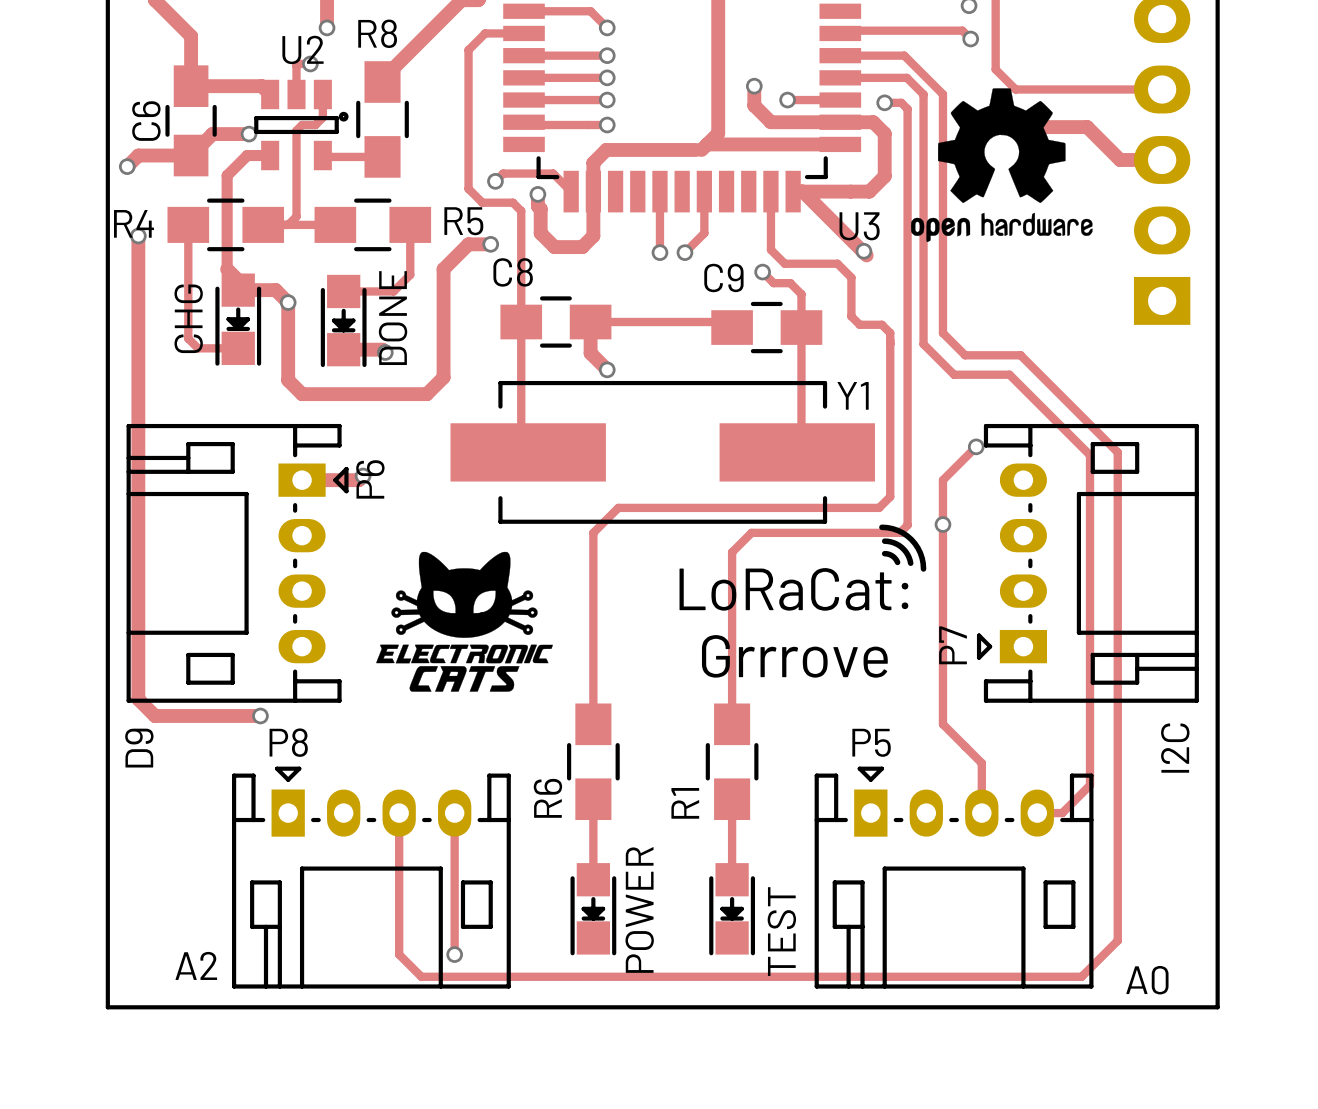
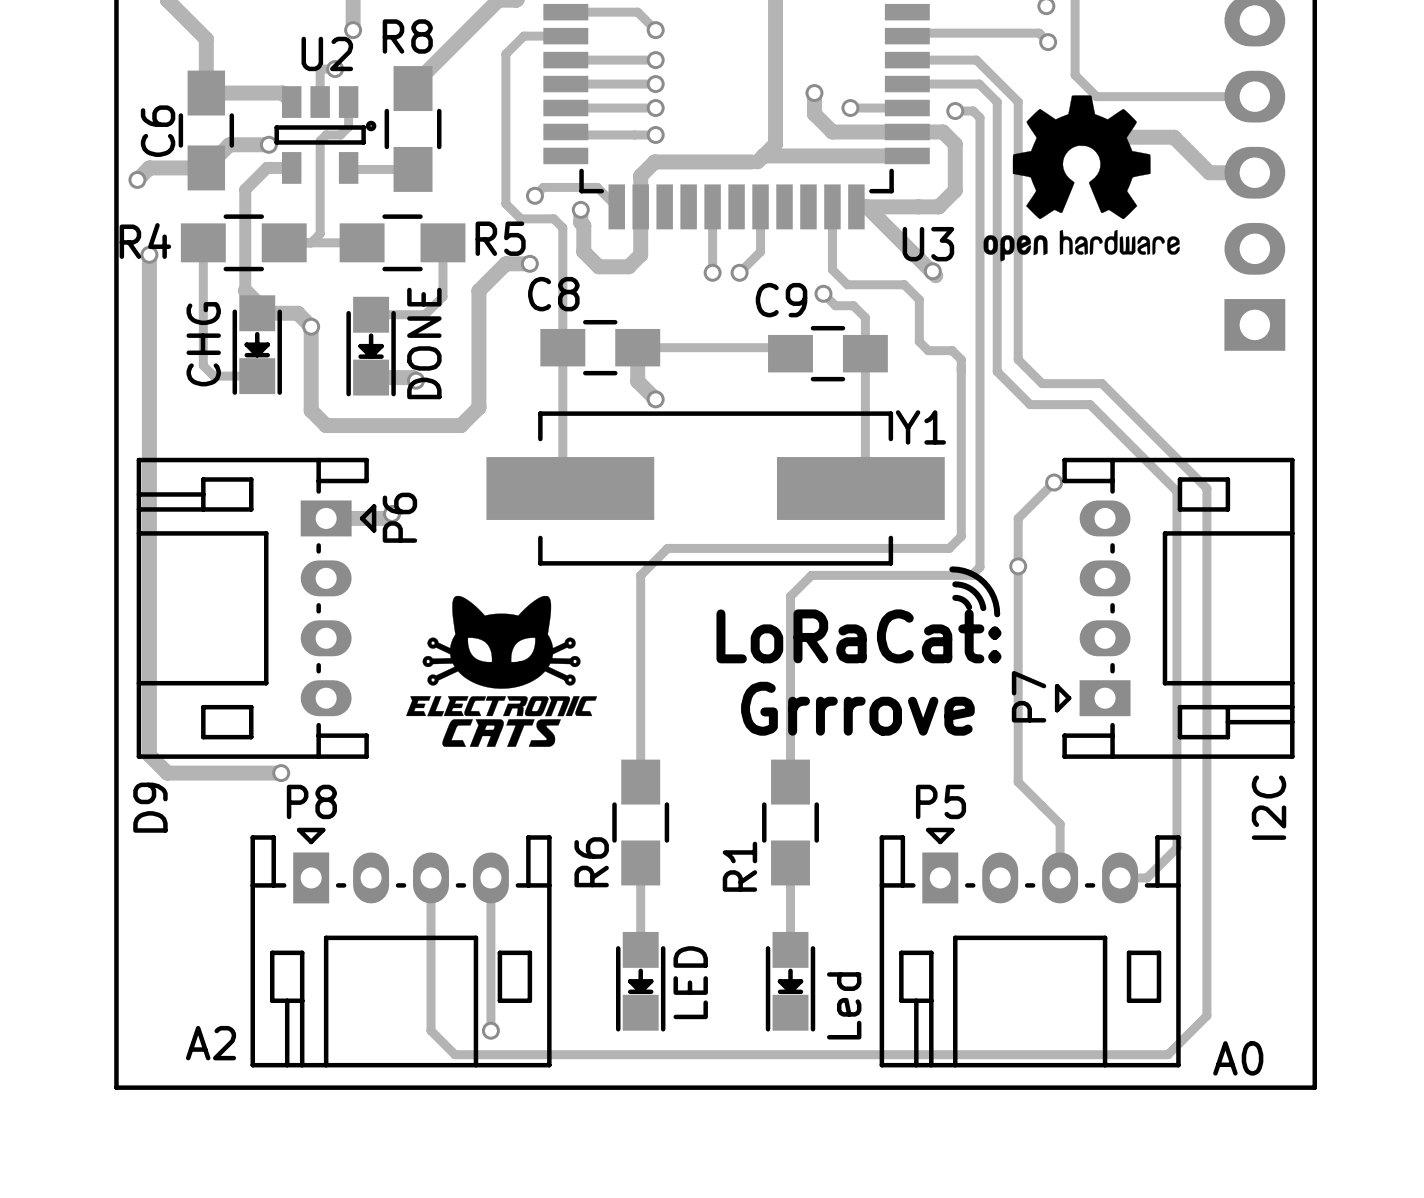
part value: POWER (639, 909) -> LED (690, 982)
part value: TEST (781, 931) -> Led (844, 1005)

